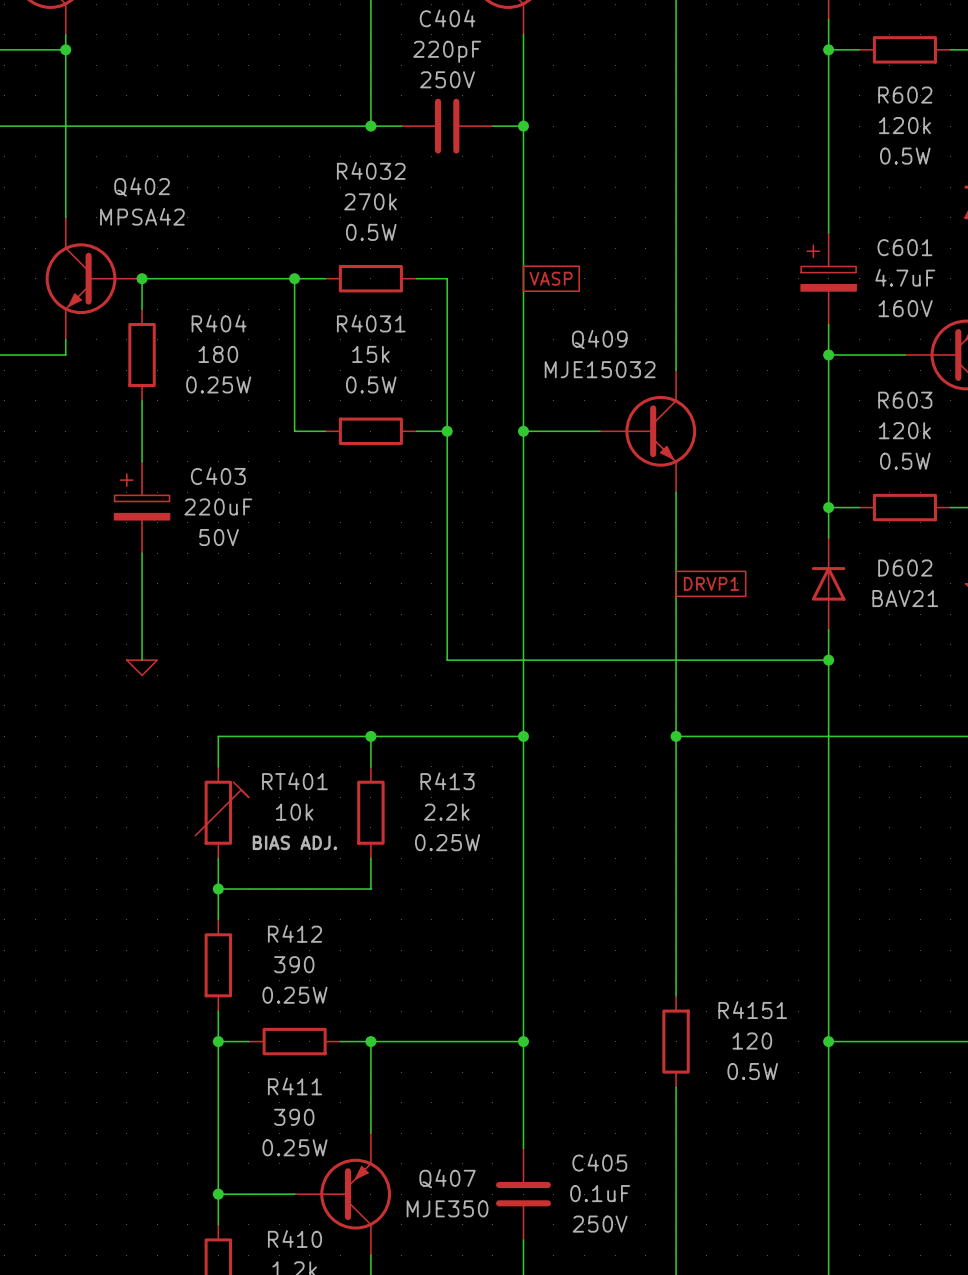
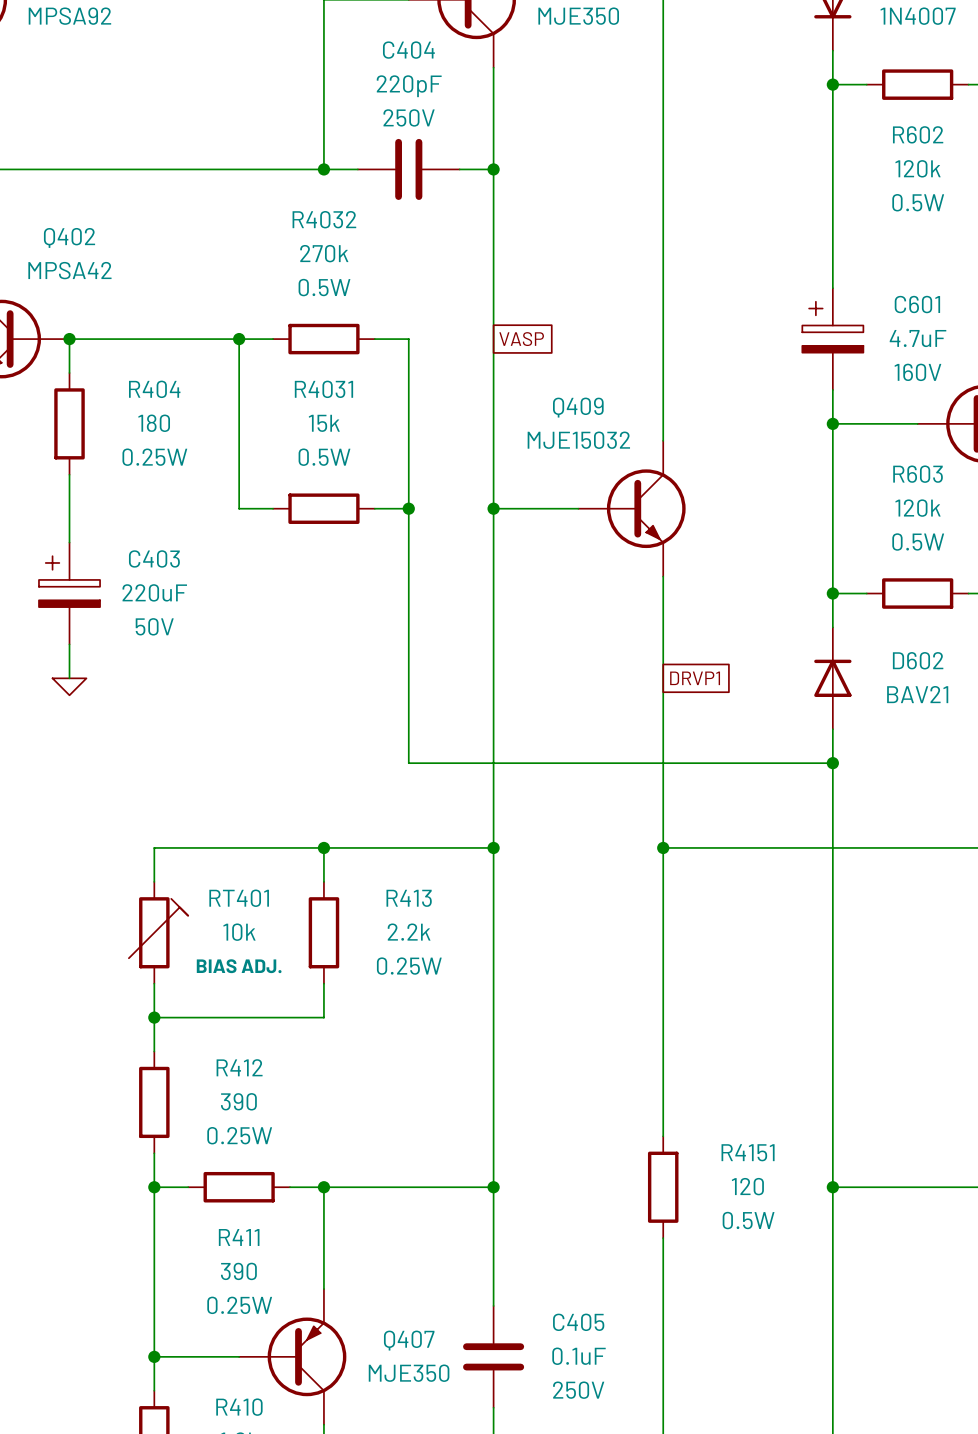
wire: (142, 583) (142, 660) -> none
power symbol position: (142, 667) -> (69, 686)

